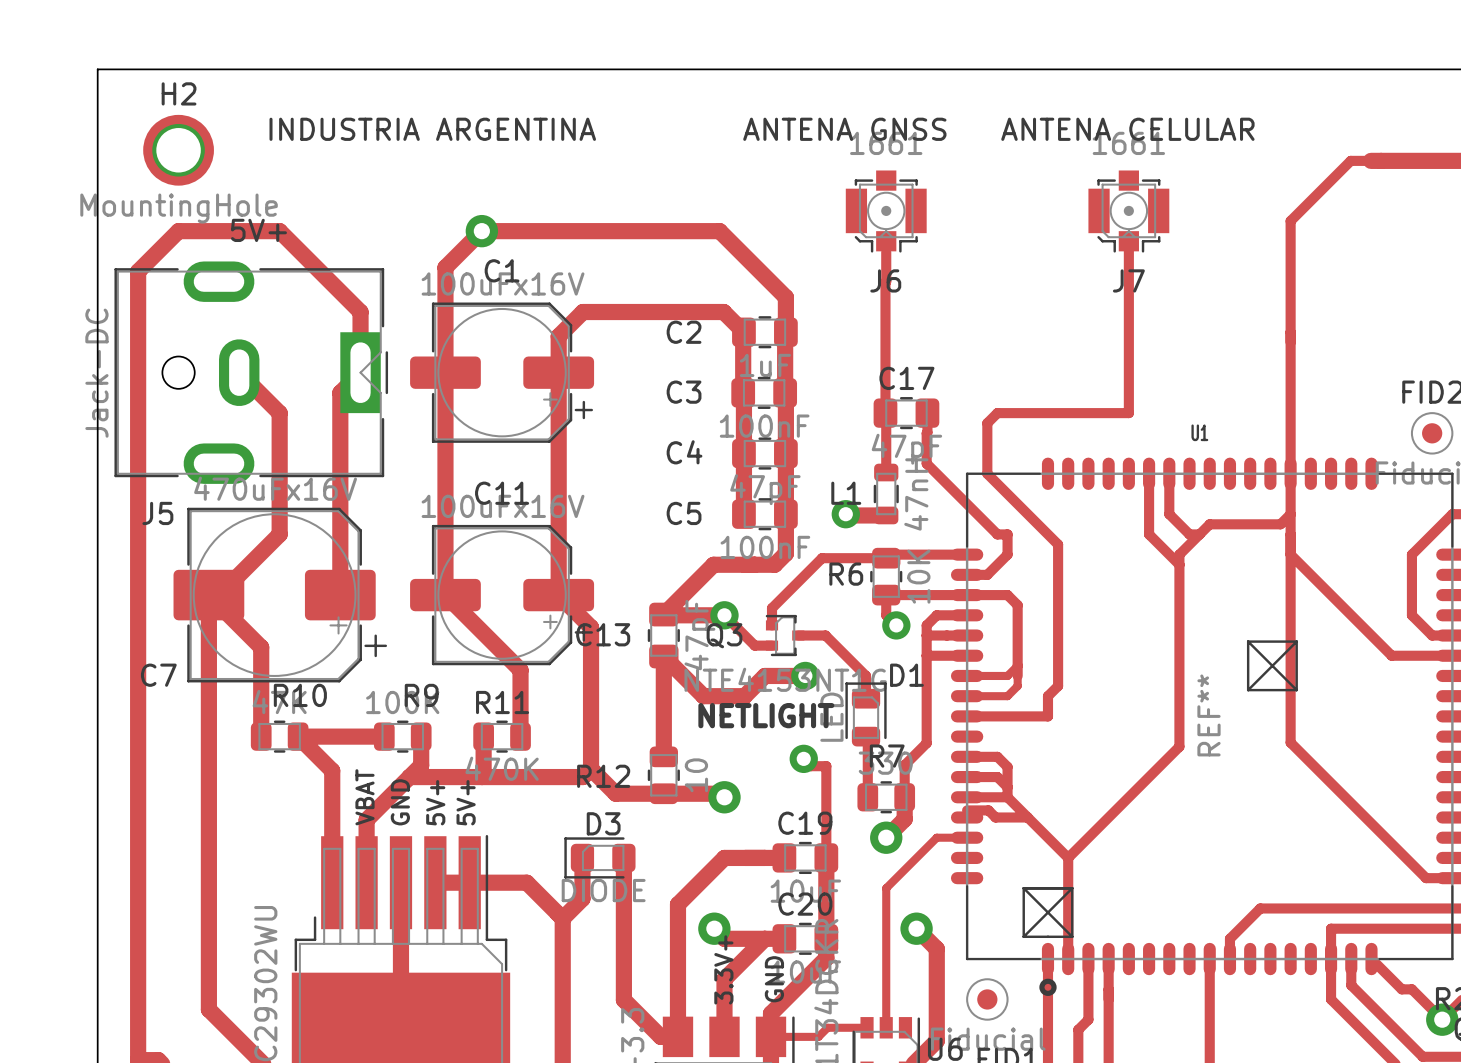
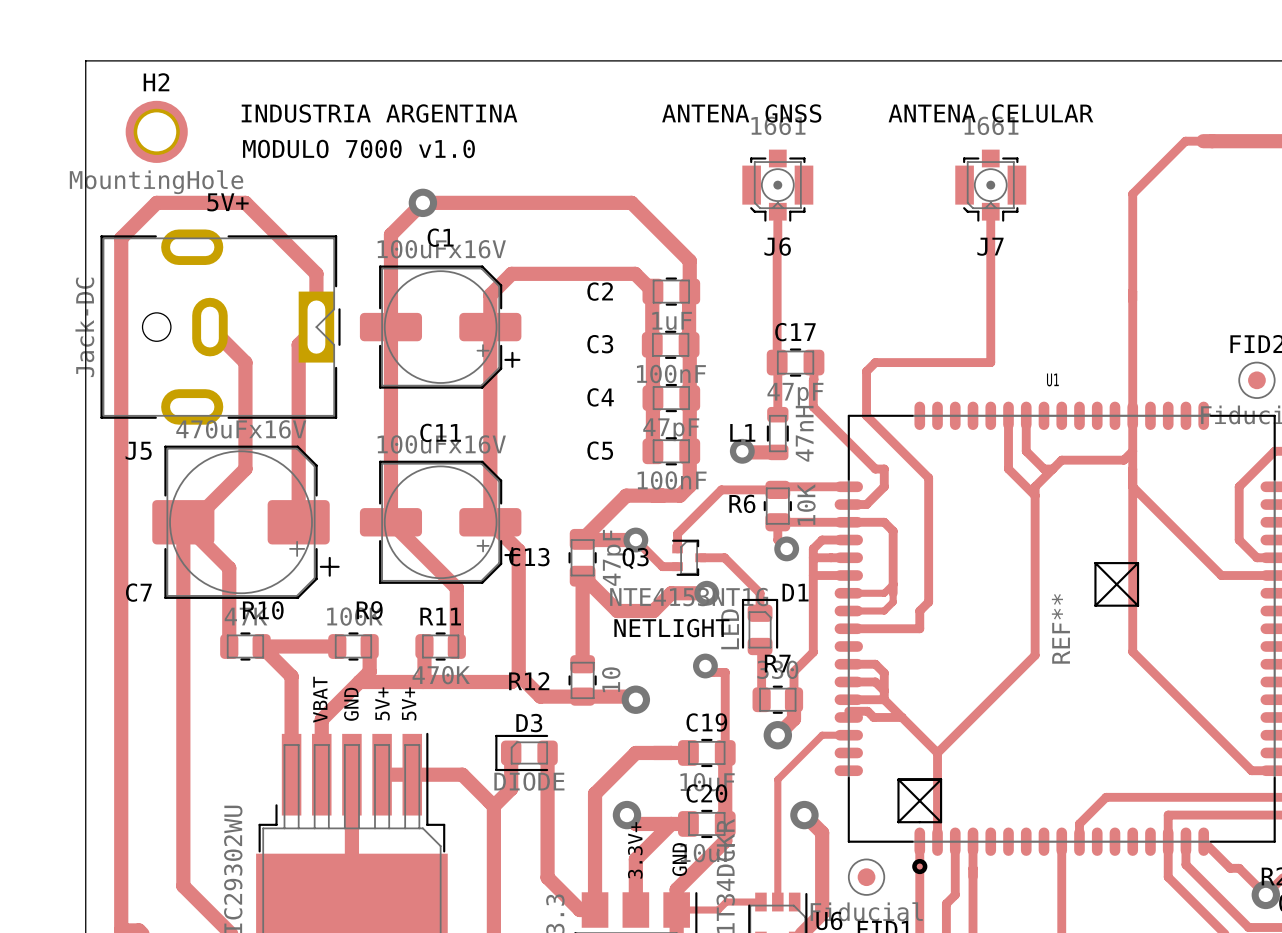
text: none -> MODULO 7000 v1.0 (358, 148)

